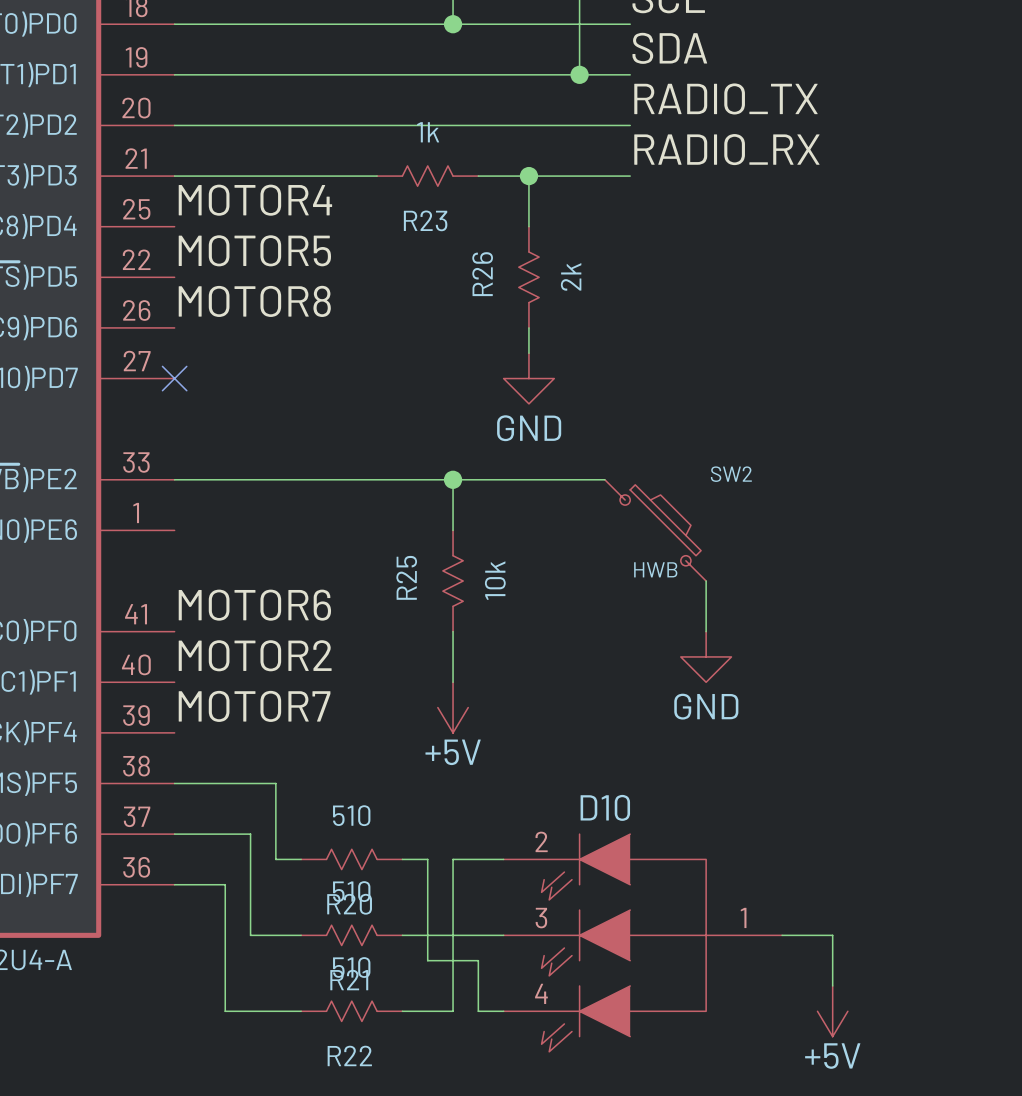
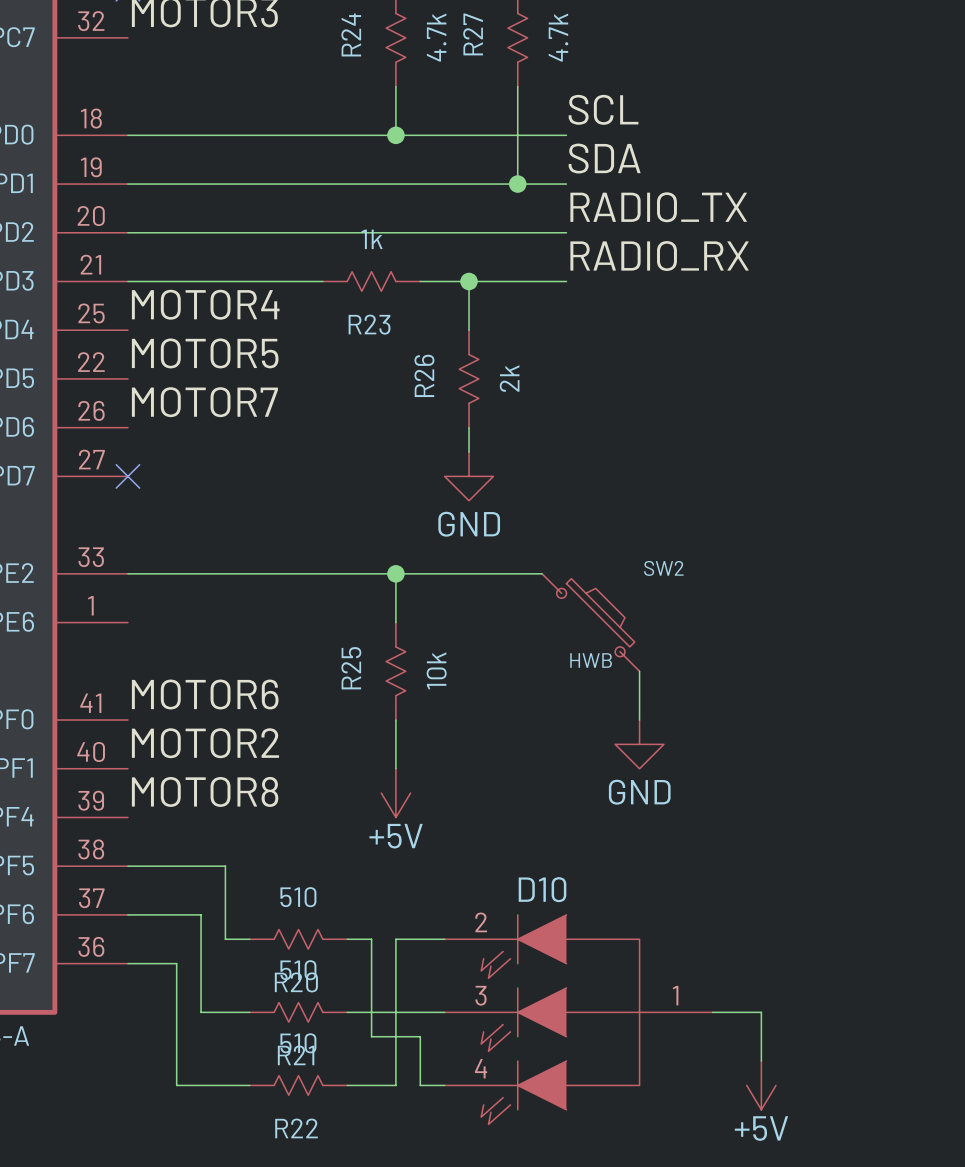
label: MOTOR8 (254, 301) -> MOTOR7 (204, 402)
label: MOTOR7 (254, 706) -> MOTOR8 (205, 791)

